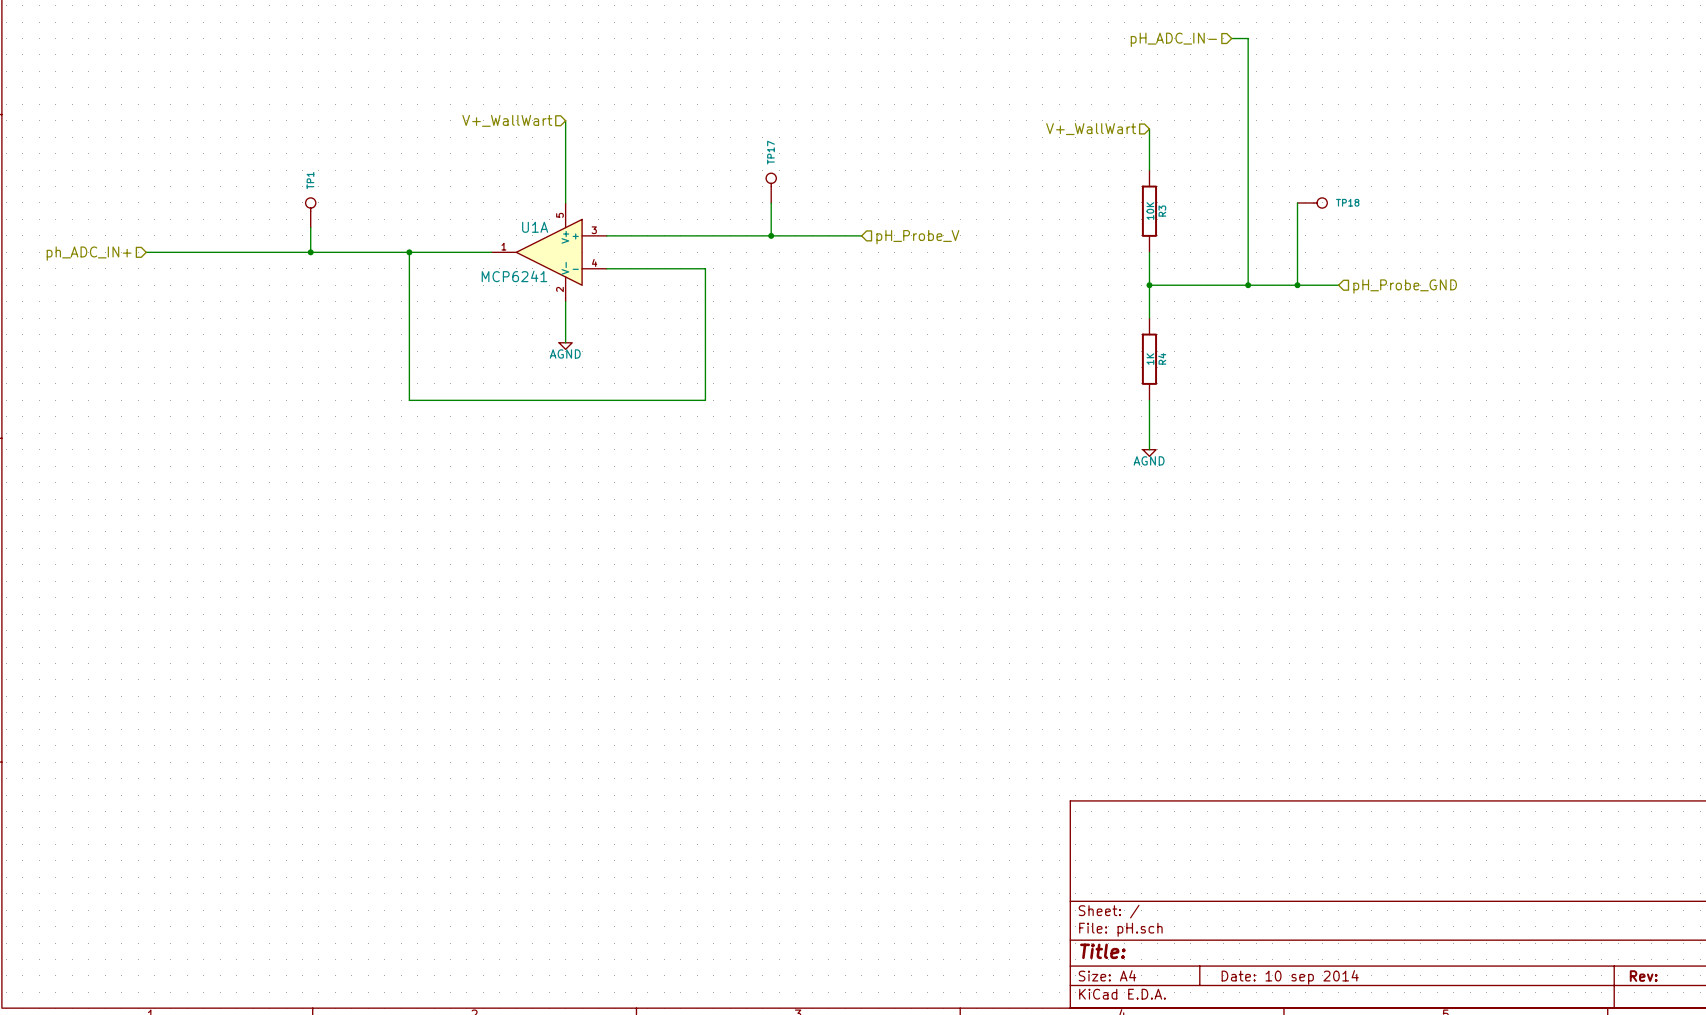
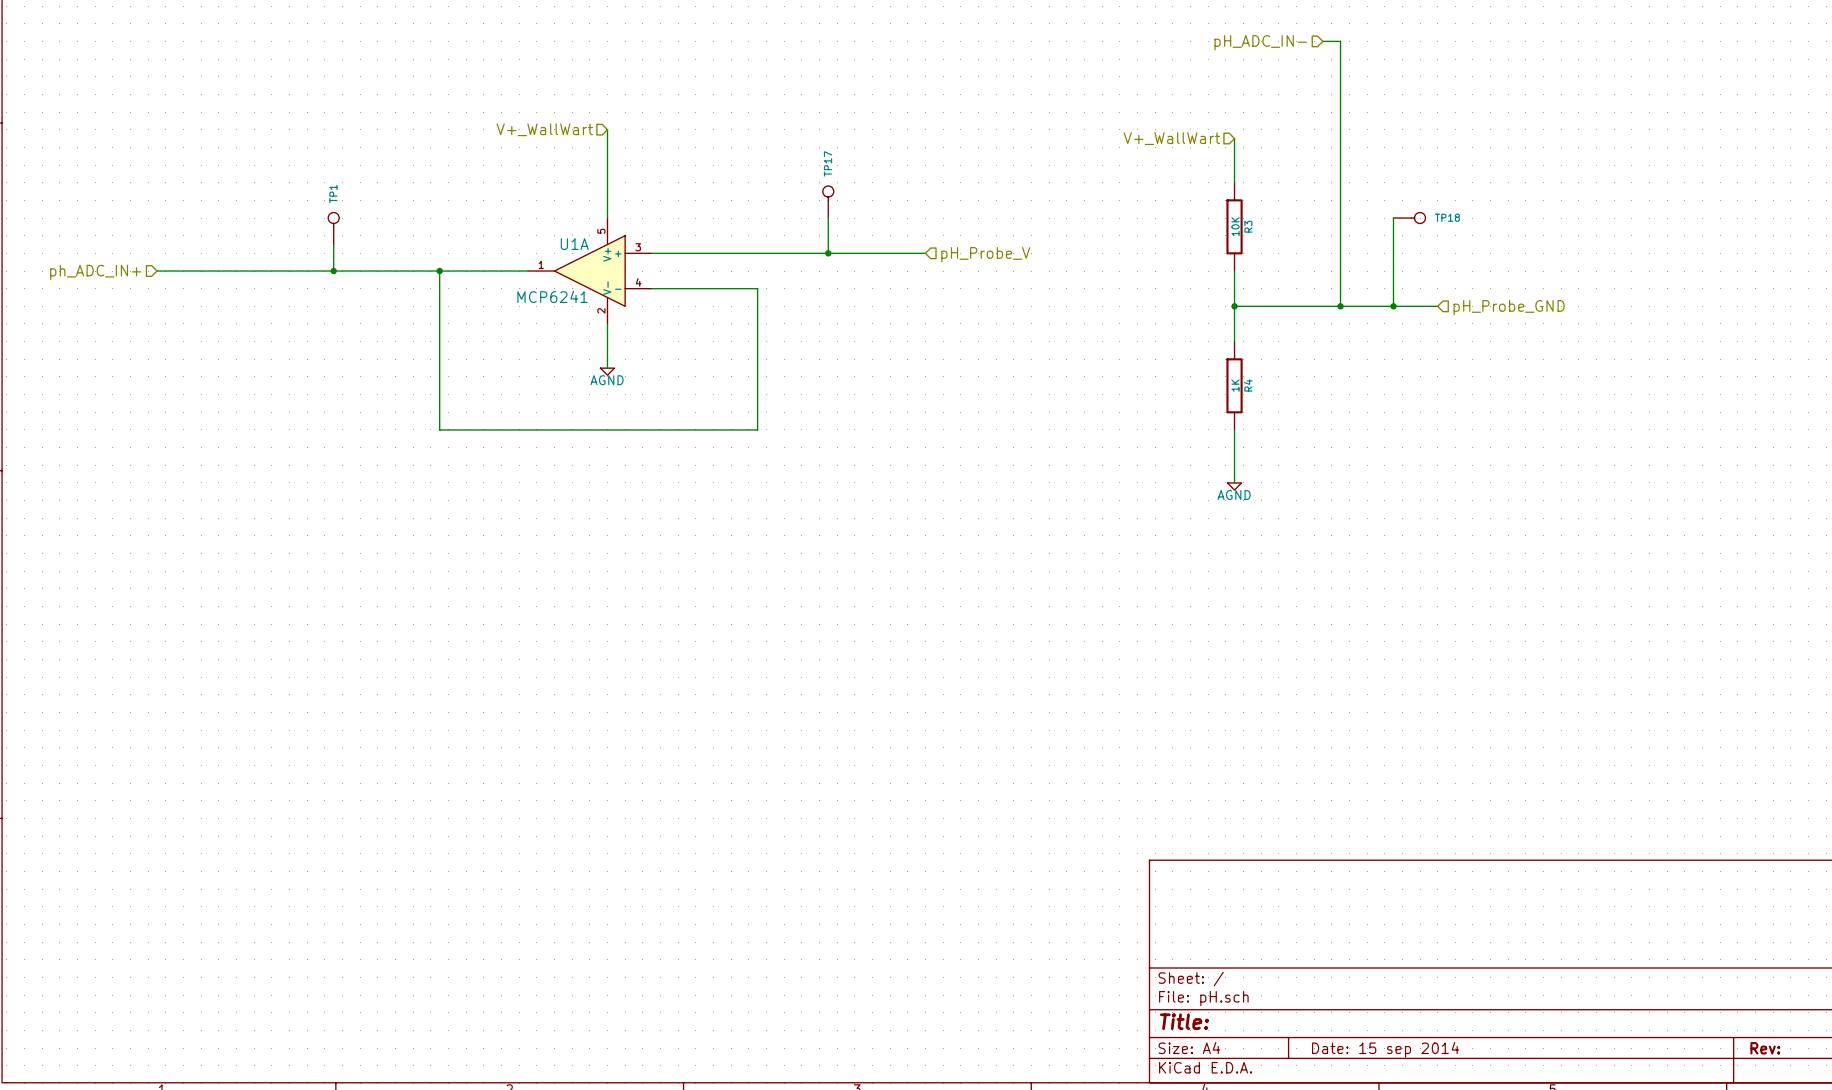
title block: Date: 10 sep 2014 (1290, 977) -> Date: 15 sep 2014 (1385, 1049)

